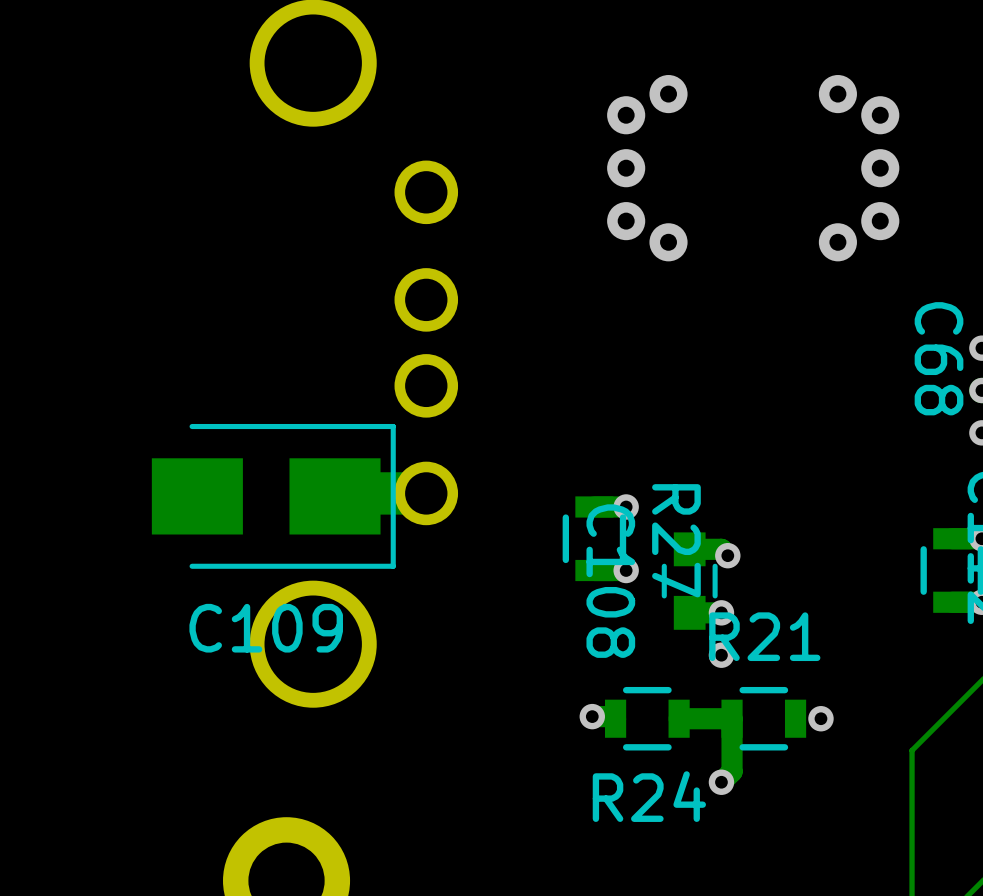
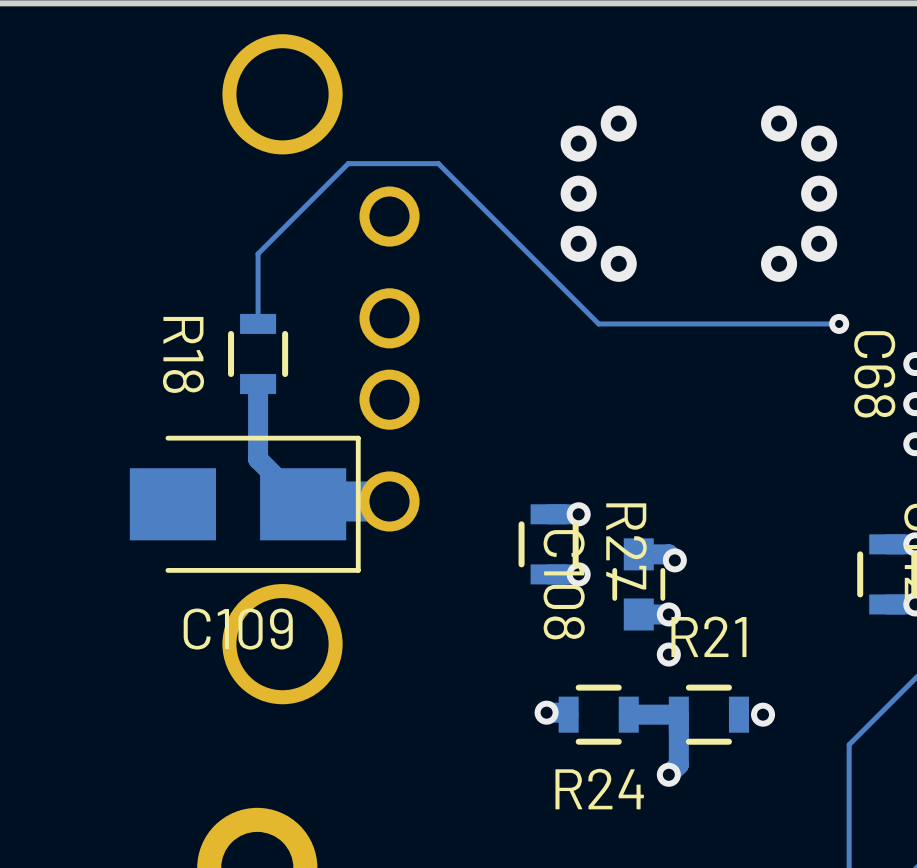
track: none -> (839, 323) (598, 323) (438, 163) (348, 163) (258, 253) (258, 323)
via: none -> (839, 323)
R18: none -> (258, 353)
track: none -> (258, 384) (258, 459) (303, 504)

